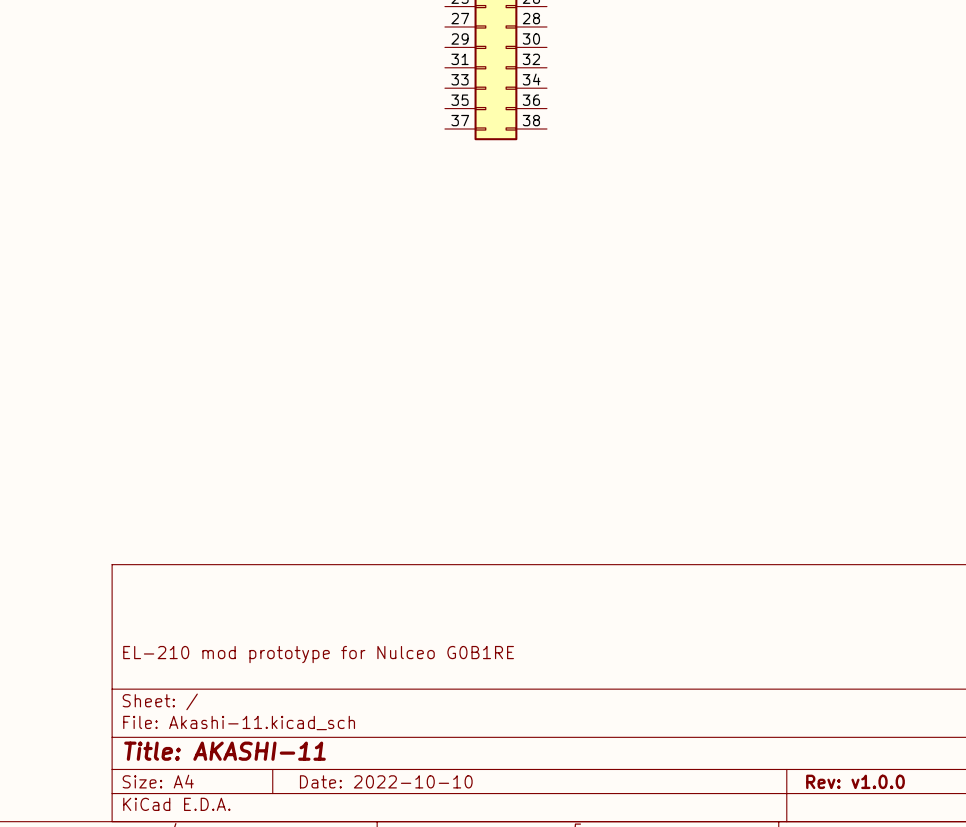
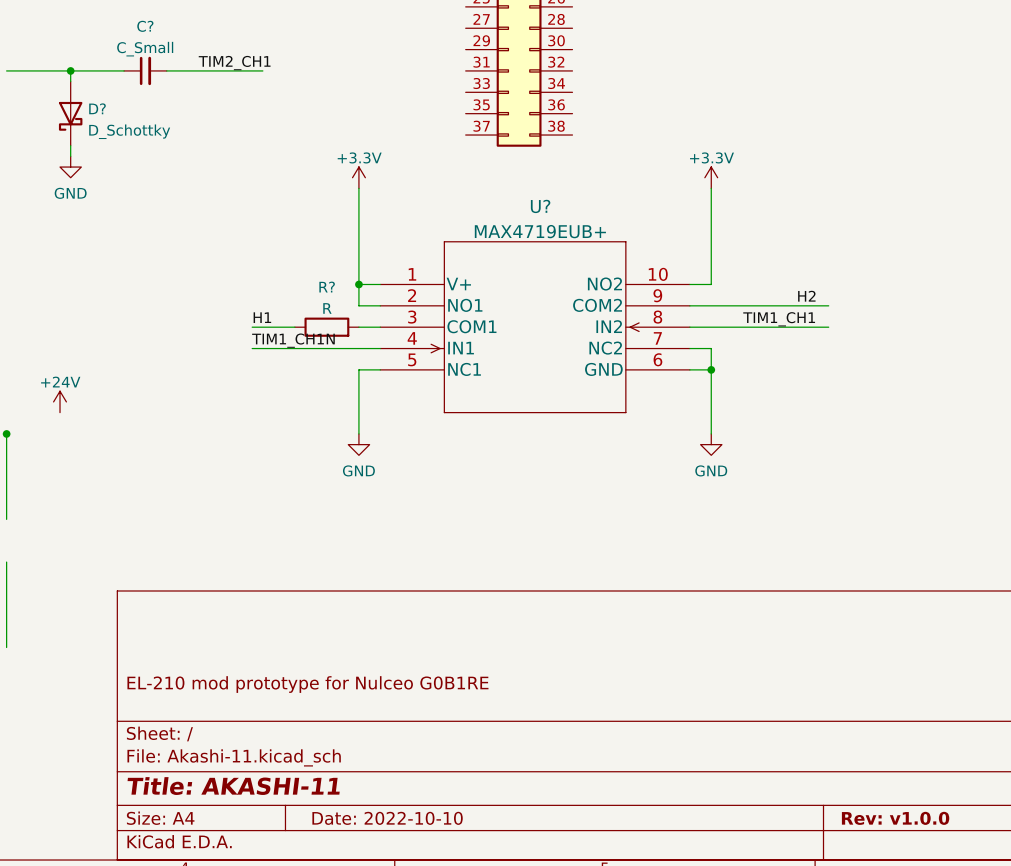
label: none -> TIM2_CH1 (234, 63)
wire: none -> (6, 70) (124, 70)
wire: none -> (70, 70) (70, 81)
junction: none -> (70, 70)
C?: none -> C_Small (145, 70)
wire: none -> (166, 70) (262, 70)
D?: none -> D_Schottky (70, 113)
wire: none -> (70, 145) (70, 156)
power symbol: none -> GND (70, 167)
power symbol: none -> +3.3V (358, 177)
power symbol: none -> +3.3V (711, 177)
wire: none -> (358, 188) (358, 305) (380, 305)
wire: none -> (711, 188) (711, 284) (689, 284)
wire: none -> (358, 284) (380, 284)
junction: none -> (358, 284)
label: none -> H2 (806, 296)
wire: none -> (689, 305) (828, 305)
label: none -> H1 (262, 317)
label: none -> TIM1_CH1 (779, 319)
wire: none -> (252, 327) (294, 327)
R?: none -> R (326, 327)
wire: none -> (358, 327) (380, 327)
U?: none -> MAX4719EUB+ (535, 327)
wire: none -> (689, 327) (828, 327)
label: none -> TIM1_CH1N (293, 340)
wire: none -> (252, 348) (380, 348)
wire: none -> (689, 348) (711, 348) (711, 433)
wire: none -> (380, 369) (358, 369) (358, 433)
wire: none -> (689, 369) (711, 369)
junction: none -> (711, 369)
power symbol: none -> +24V (60, 401)
wire: none -> (6, 433) (6, 519)
junction: none -> (6, 433)
power symbol: none -> GND (358, 444)
power symbol: none -> GND (711, 444)
wire: none -> (6, 562) (6, 647)

